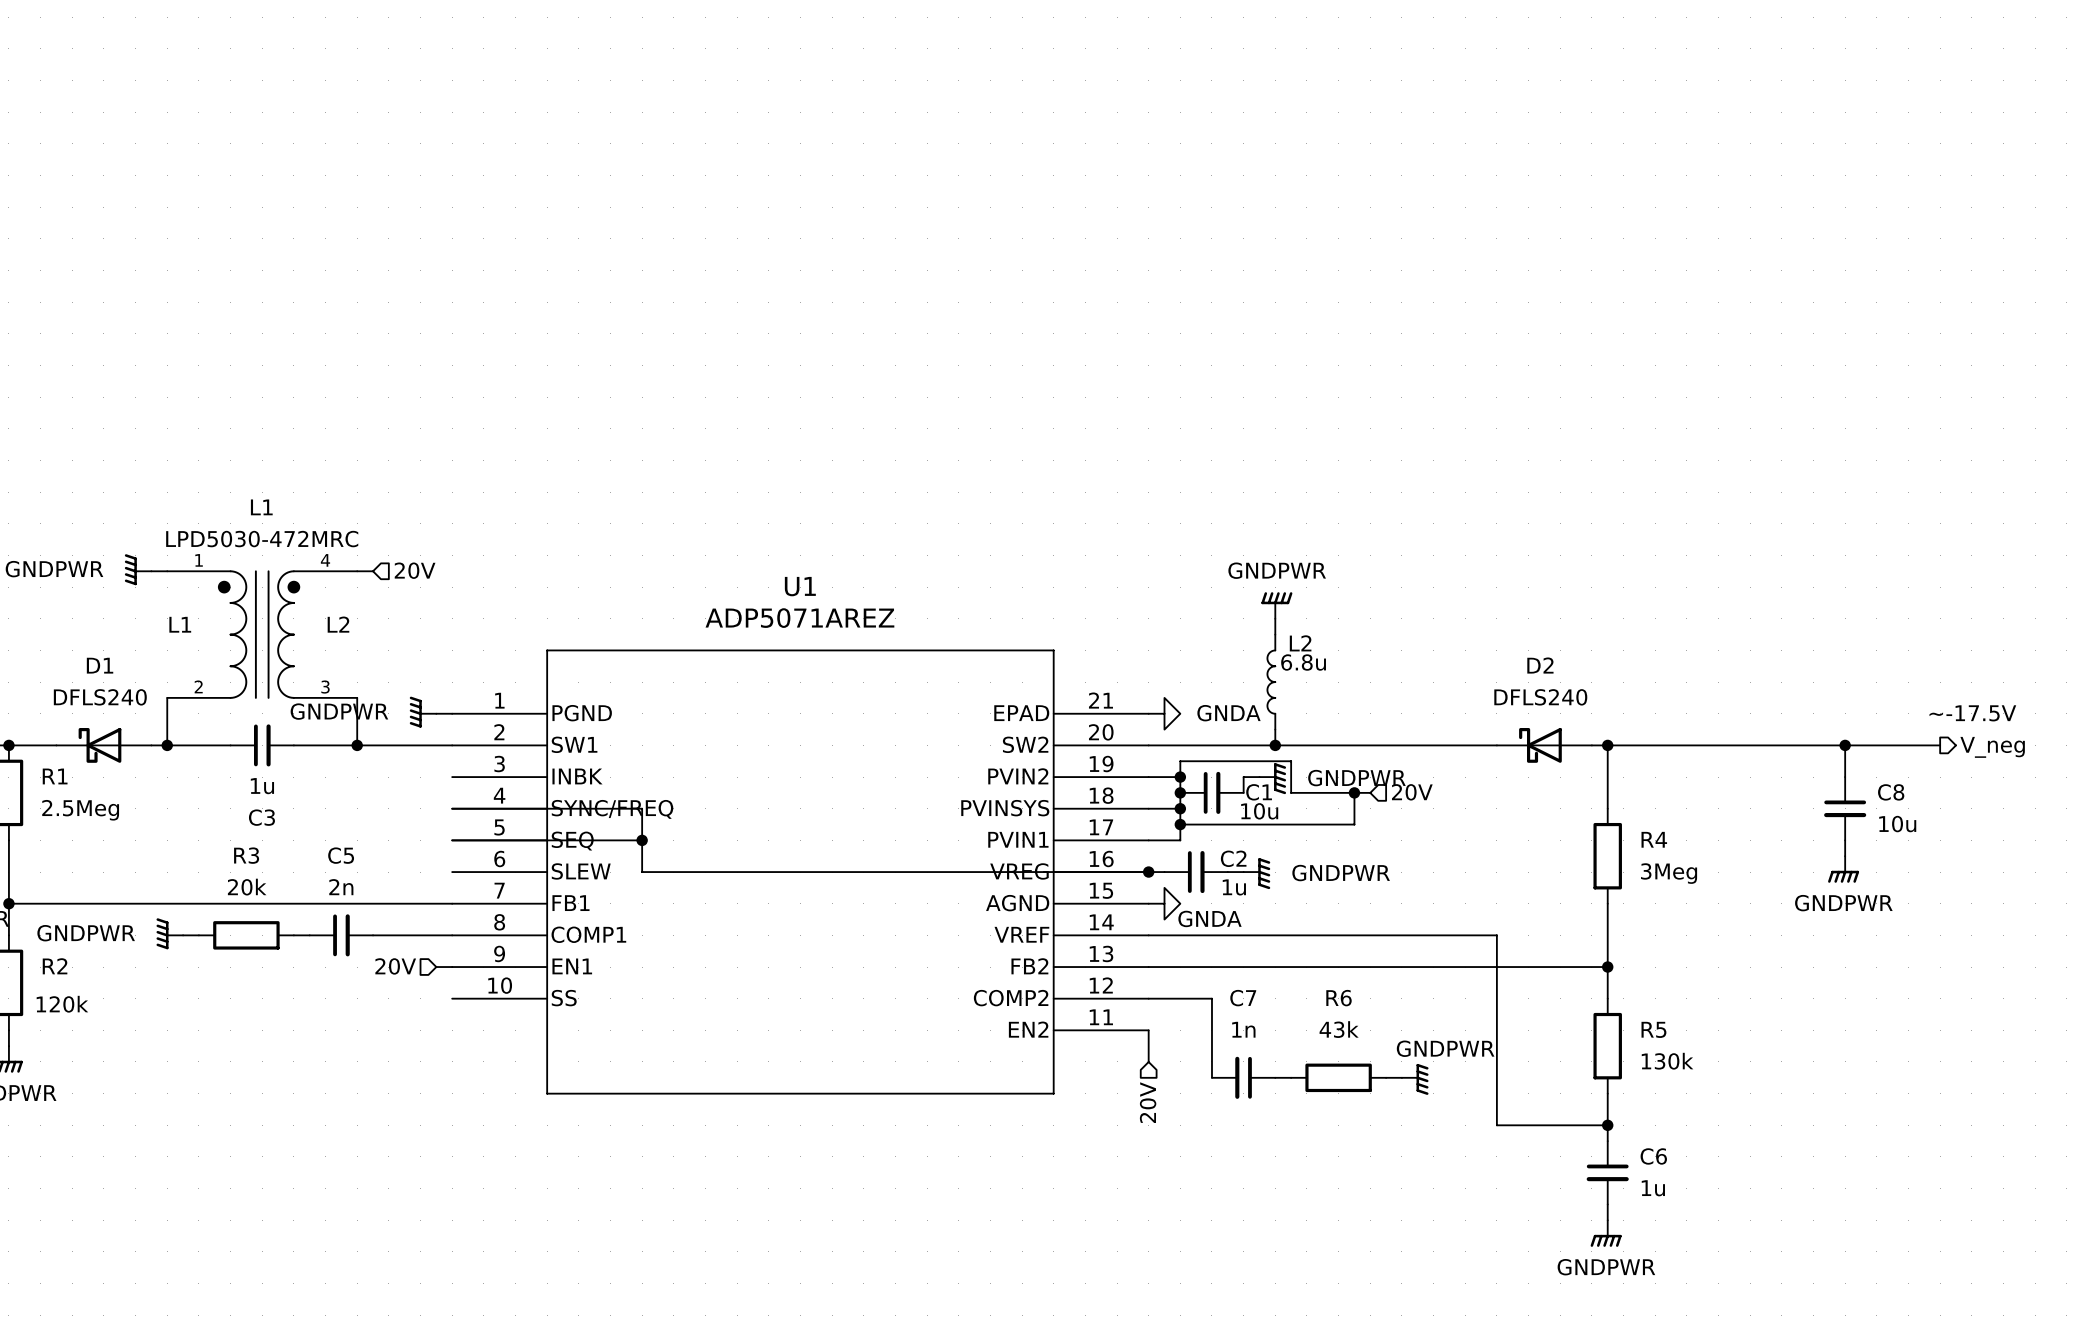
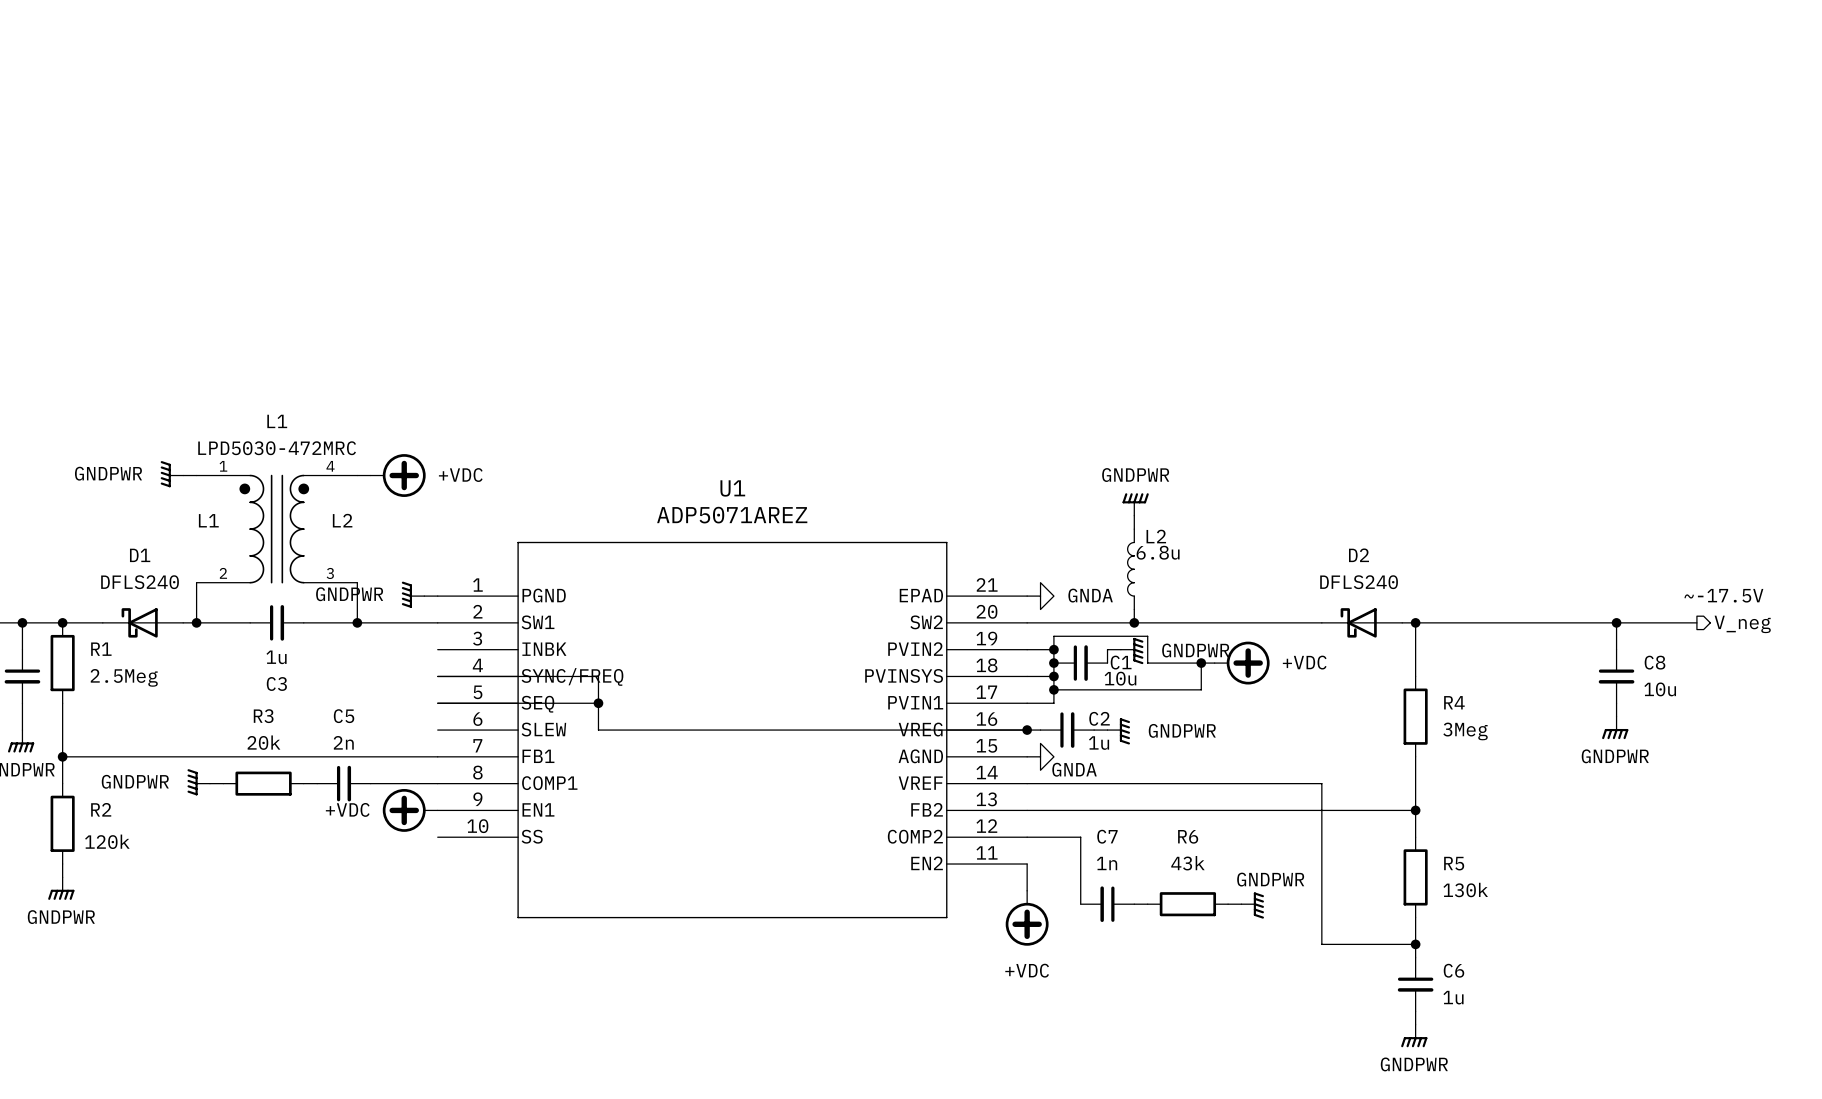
hierarchical label: 20V (415, 570) -> none
power symbol: none -> +VDC (398, 475)
power symbol: none -> +VDC (1242, 663)
hierarchical label: 20V (1412, 792) -> none
hierarchical label: 20V (395, 966) -> none
power symbol: none -> +VDC (410, 810)
power symbol: none -> +VDC (1027, 918)
hierarchical label: 20V (1148, 1102) -> none

